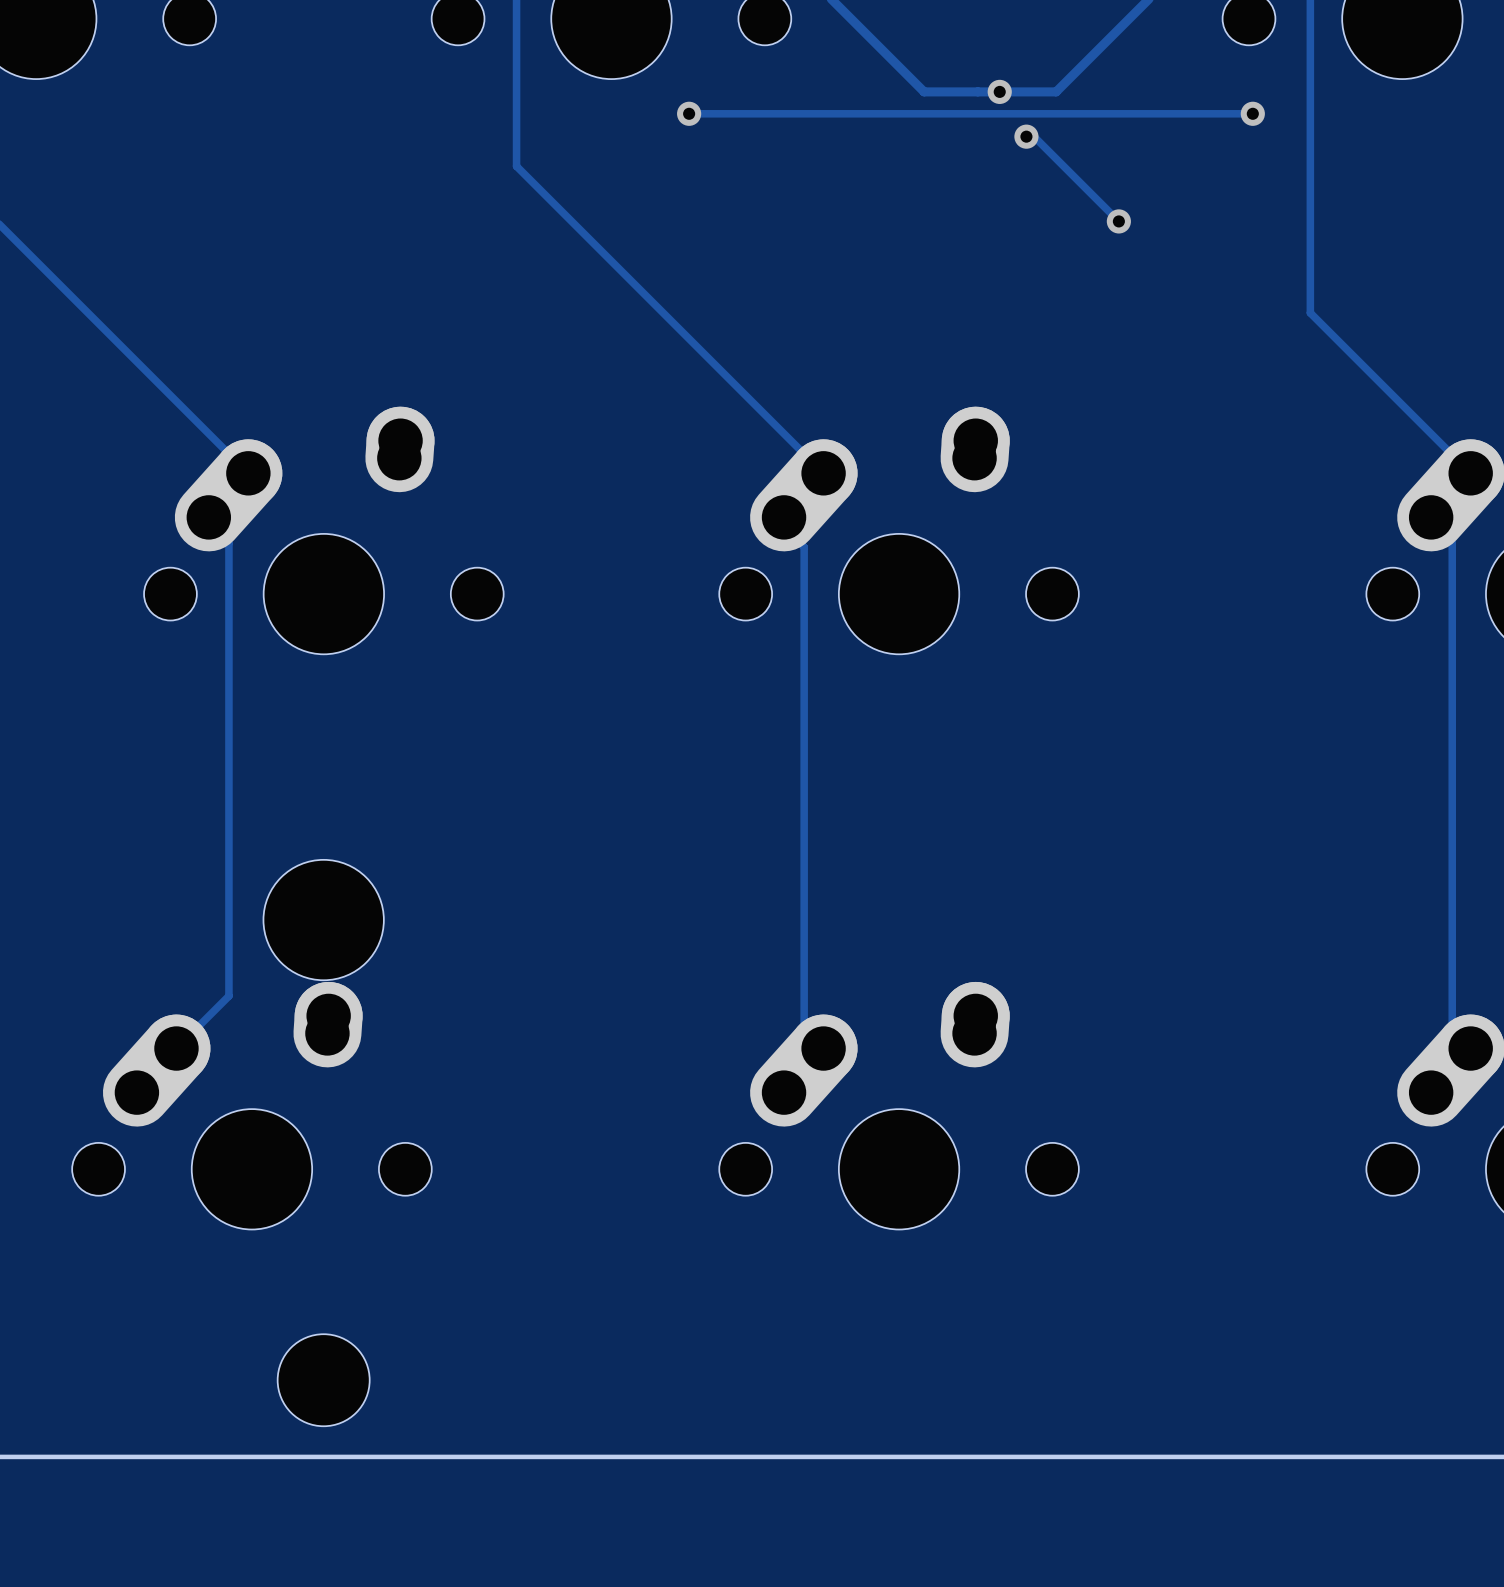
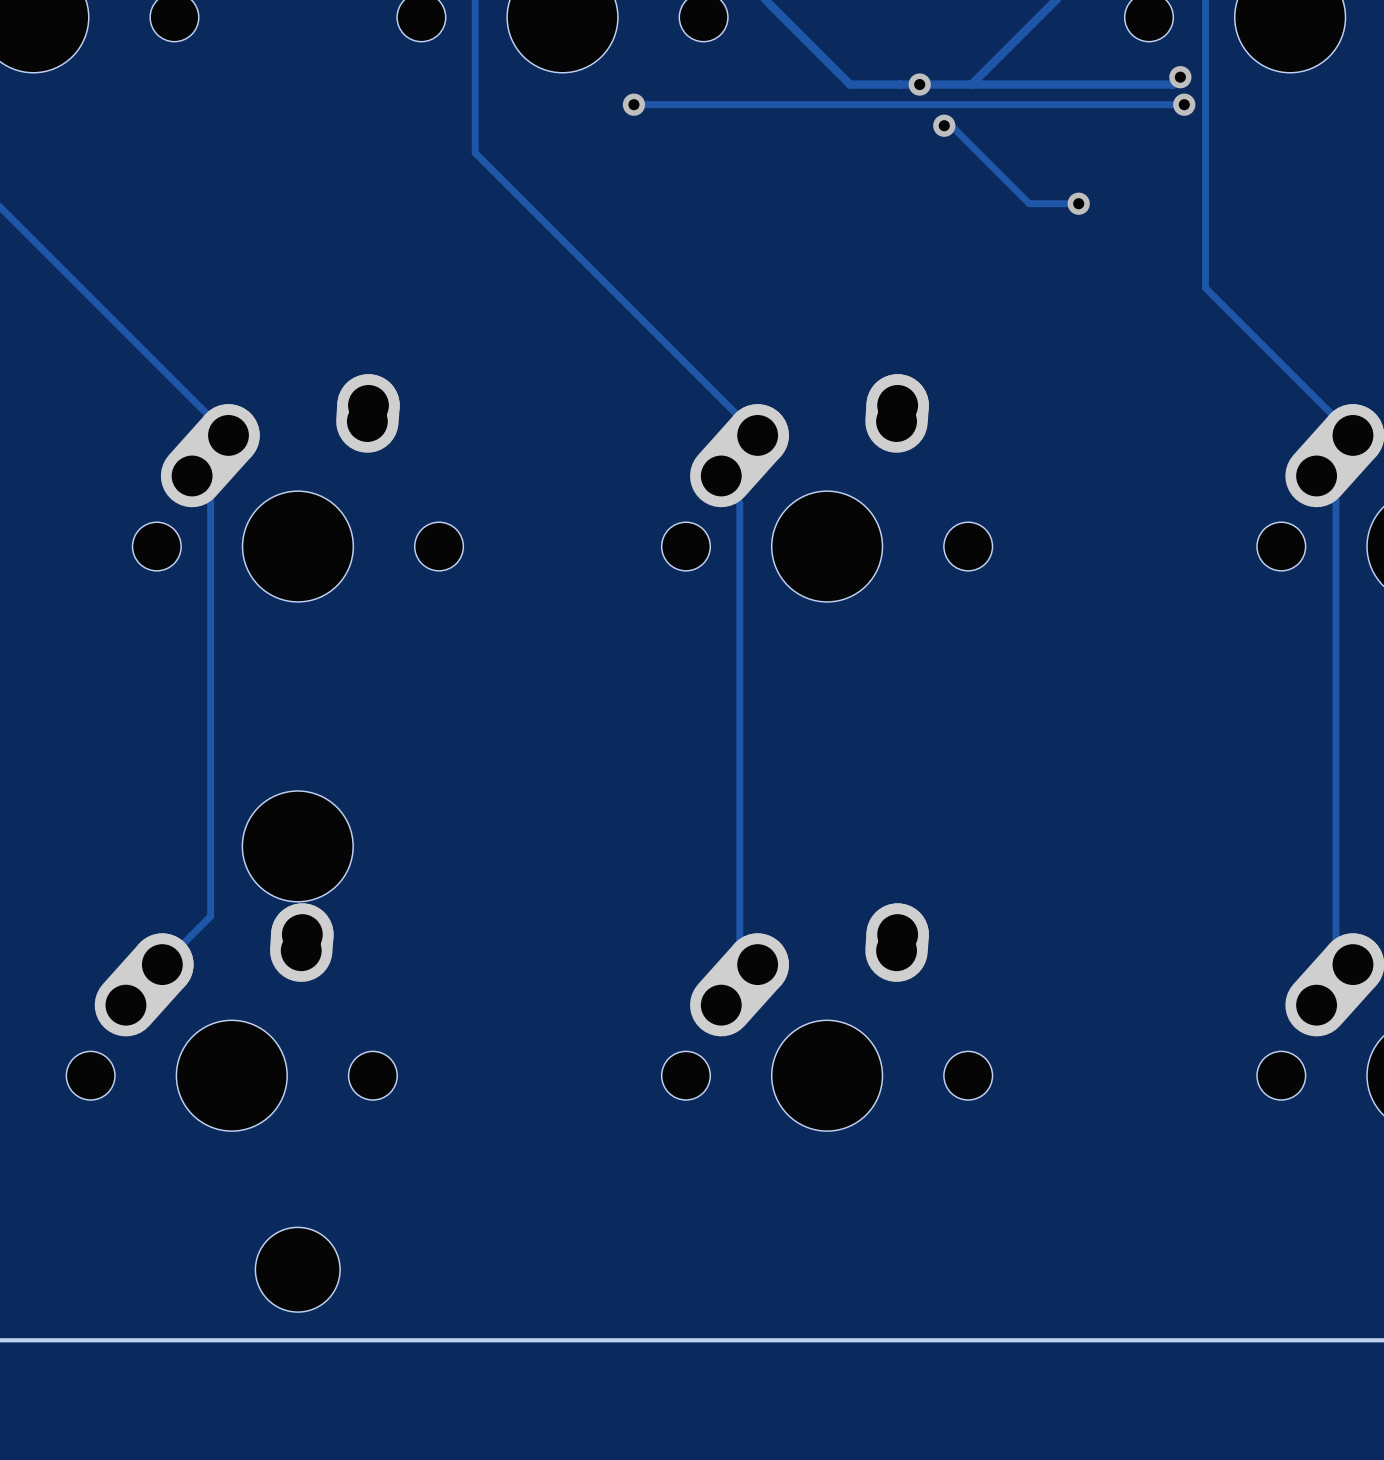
track: none -> (1180, 77) (1173, 84) (971, 84)
via: none -> (1180, 77)
track: none -> (1152, 104) (1184, 104)
via: (1252, 113) -> none
via: none -> (1184, 104)
track: none -> (1029, 203) (1078, 203)
via position: (1118, 221) -> (1078, 203)

